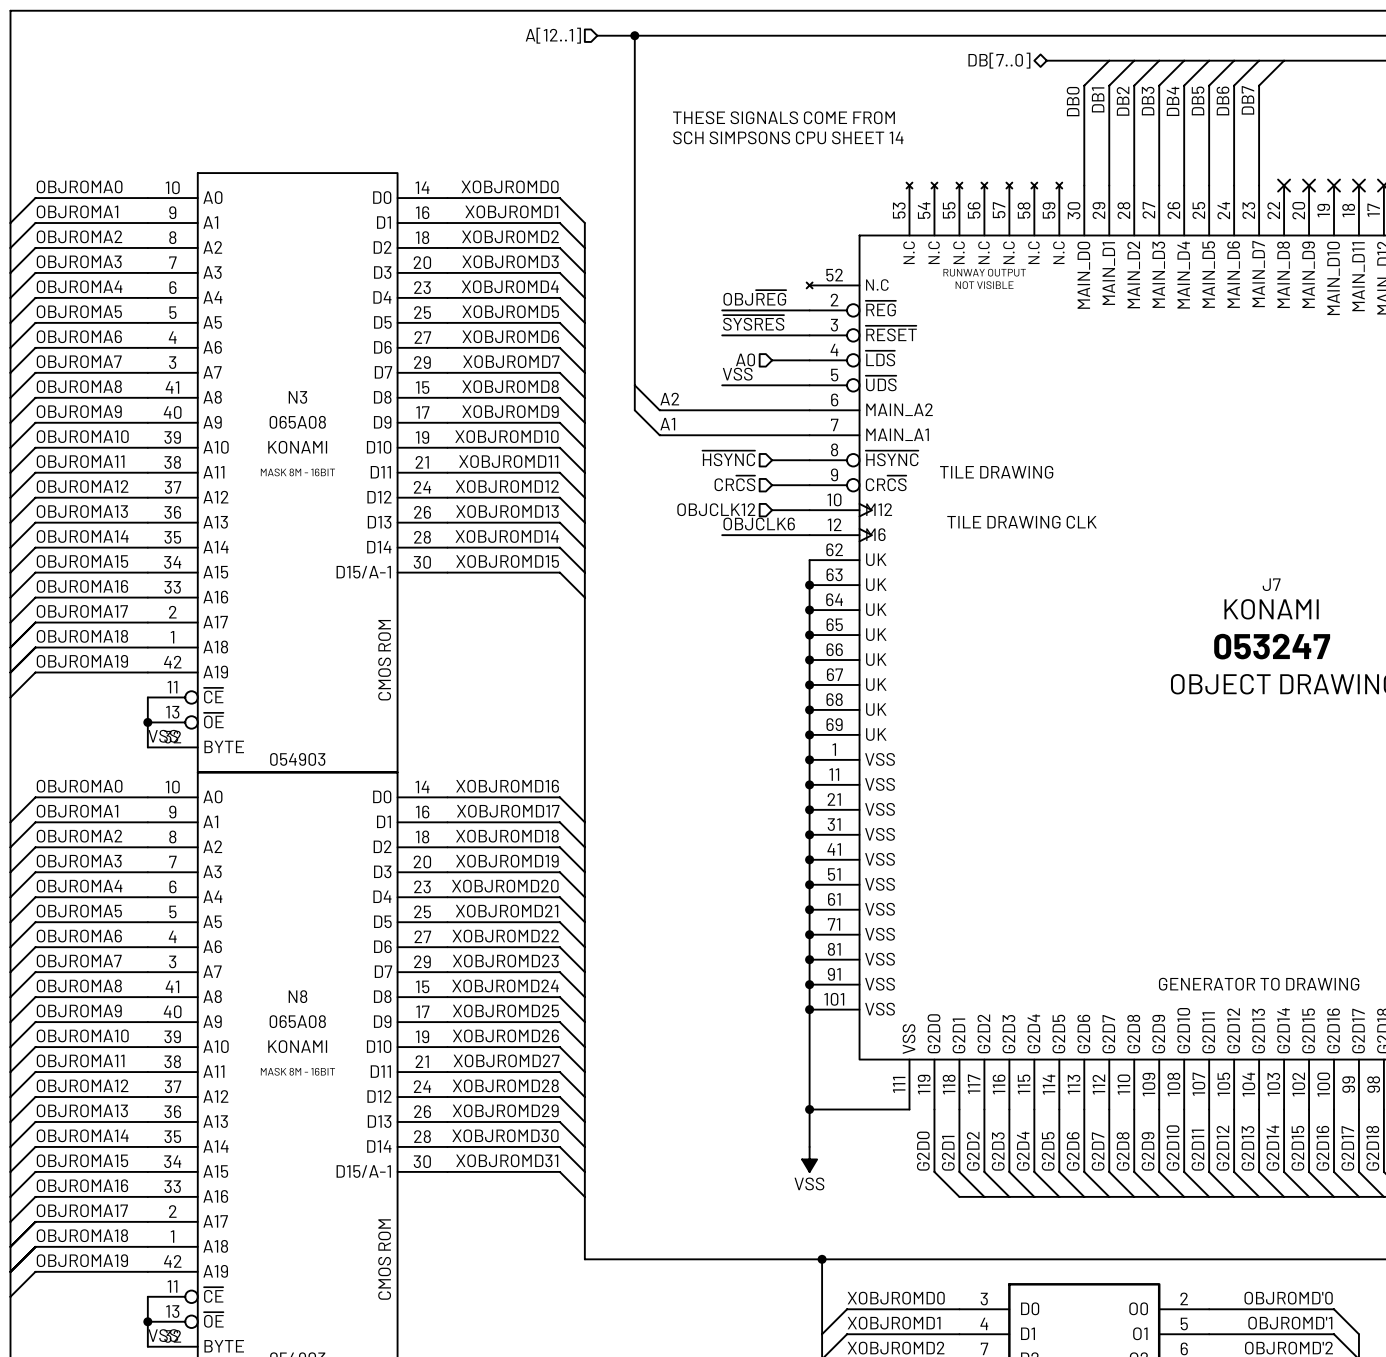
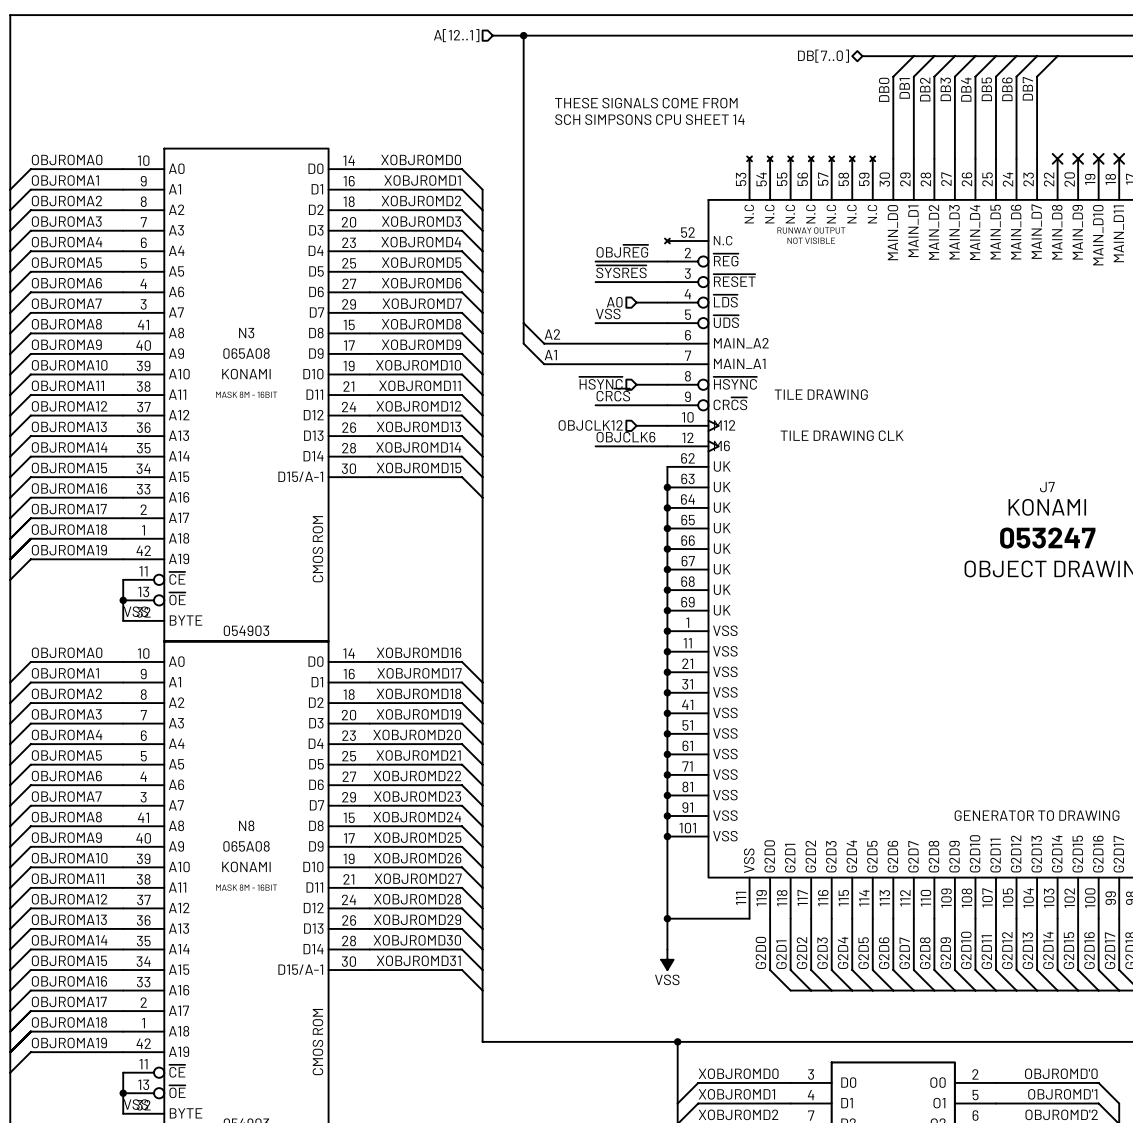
label: none -> CR~{CS} (613, 395)
hierarchical label: CR~{CS} (734, 483) -> none
wire: none -> (595, 405) (636, 405)

